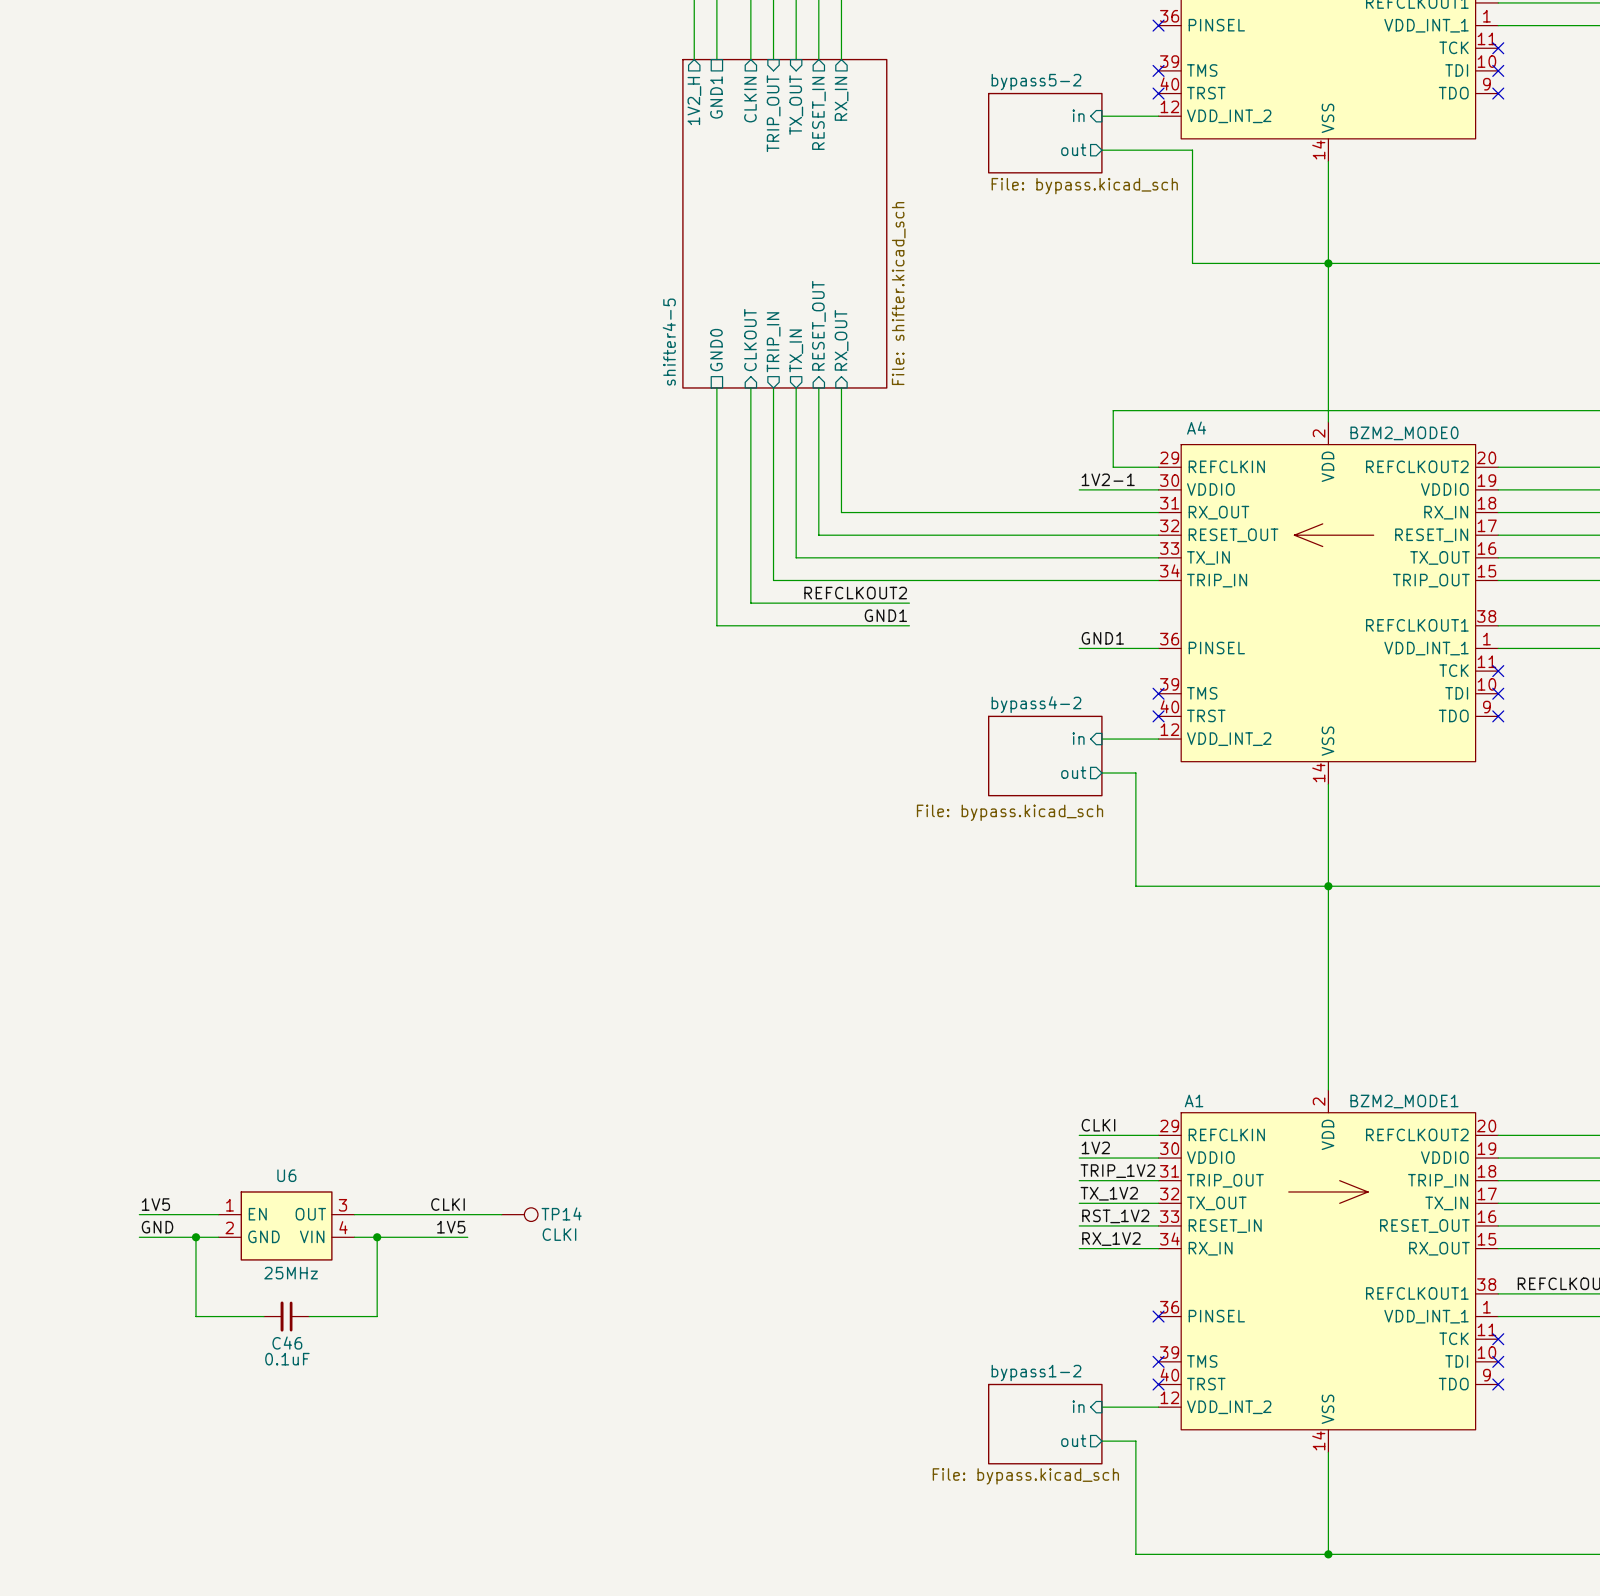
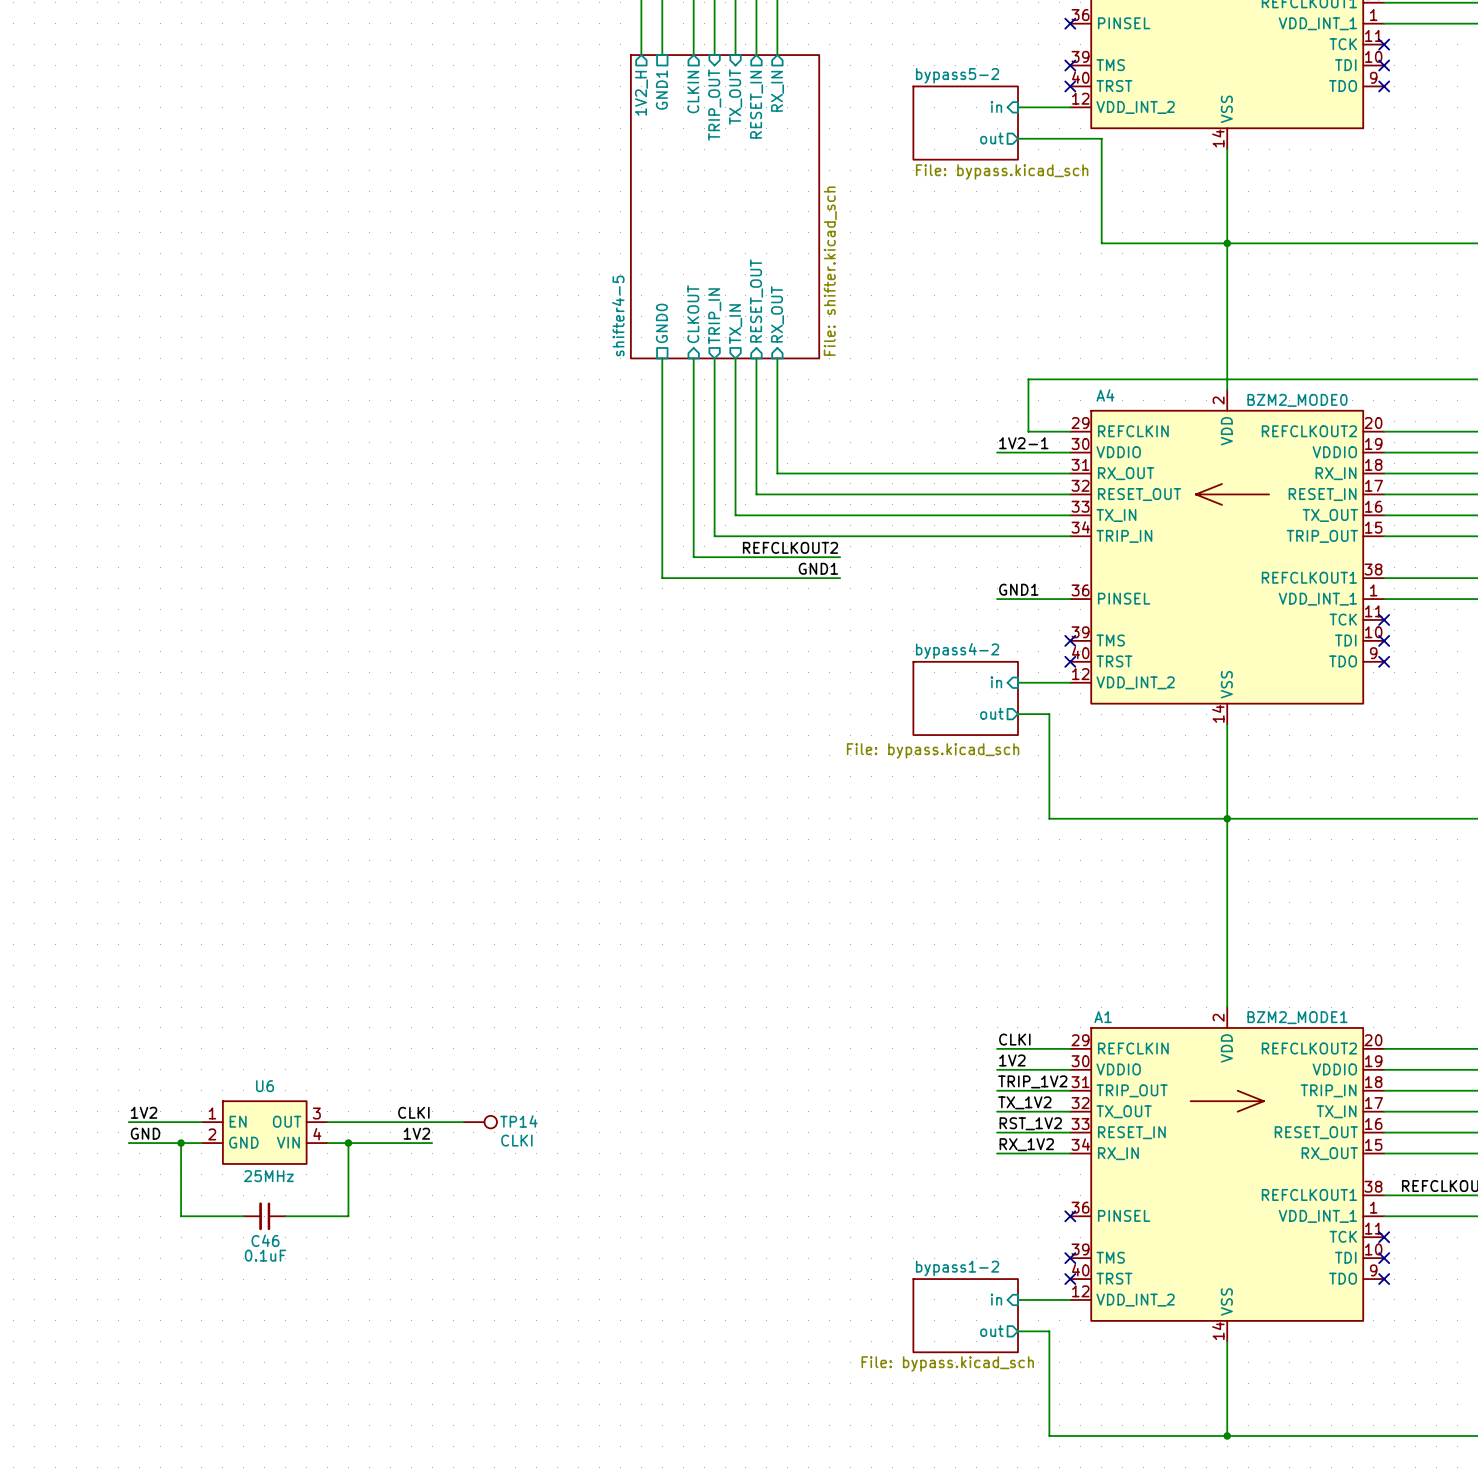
label: 1V5 (155, 1204) -> 1V2 (144, 1112)
label: 1V5 (451, 1227) -> 1V2 (416, 1133)

